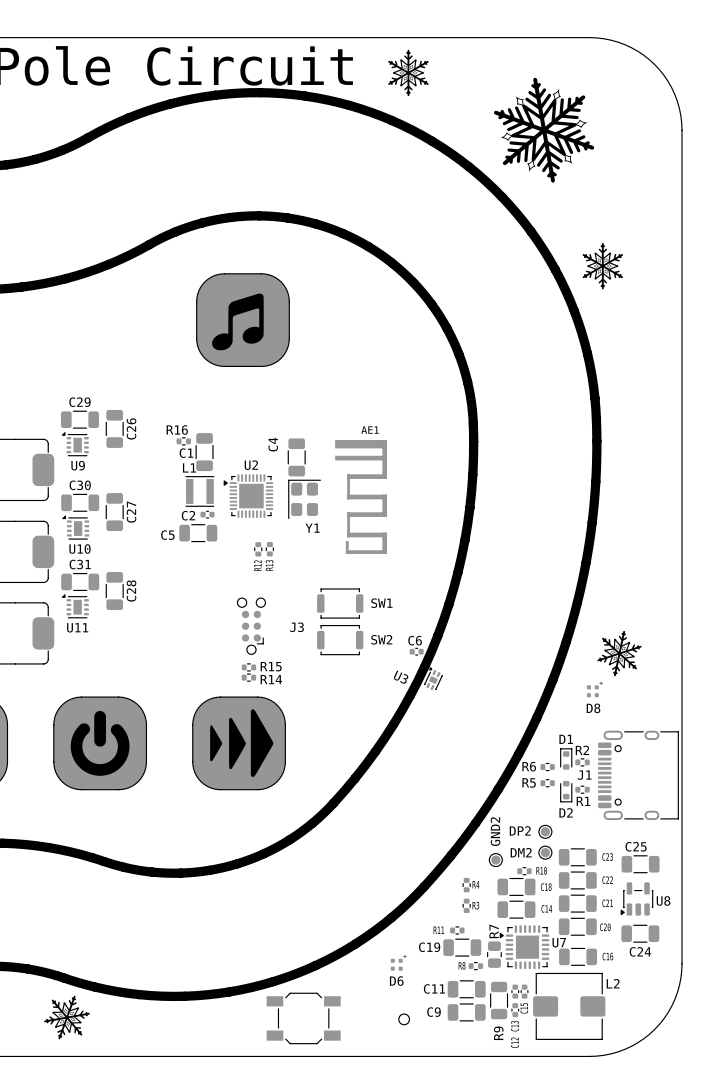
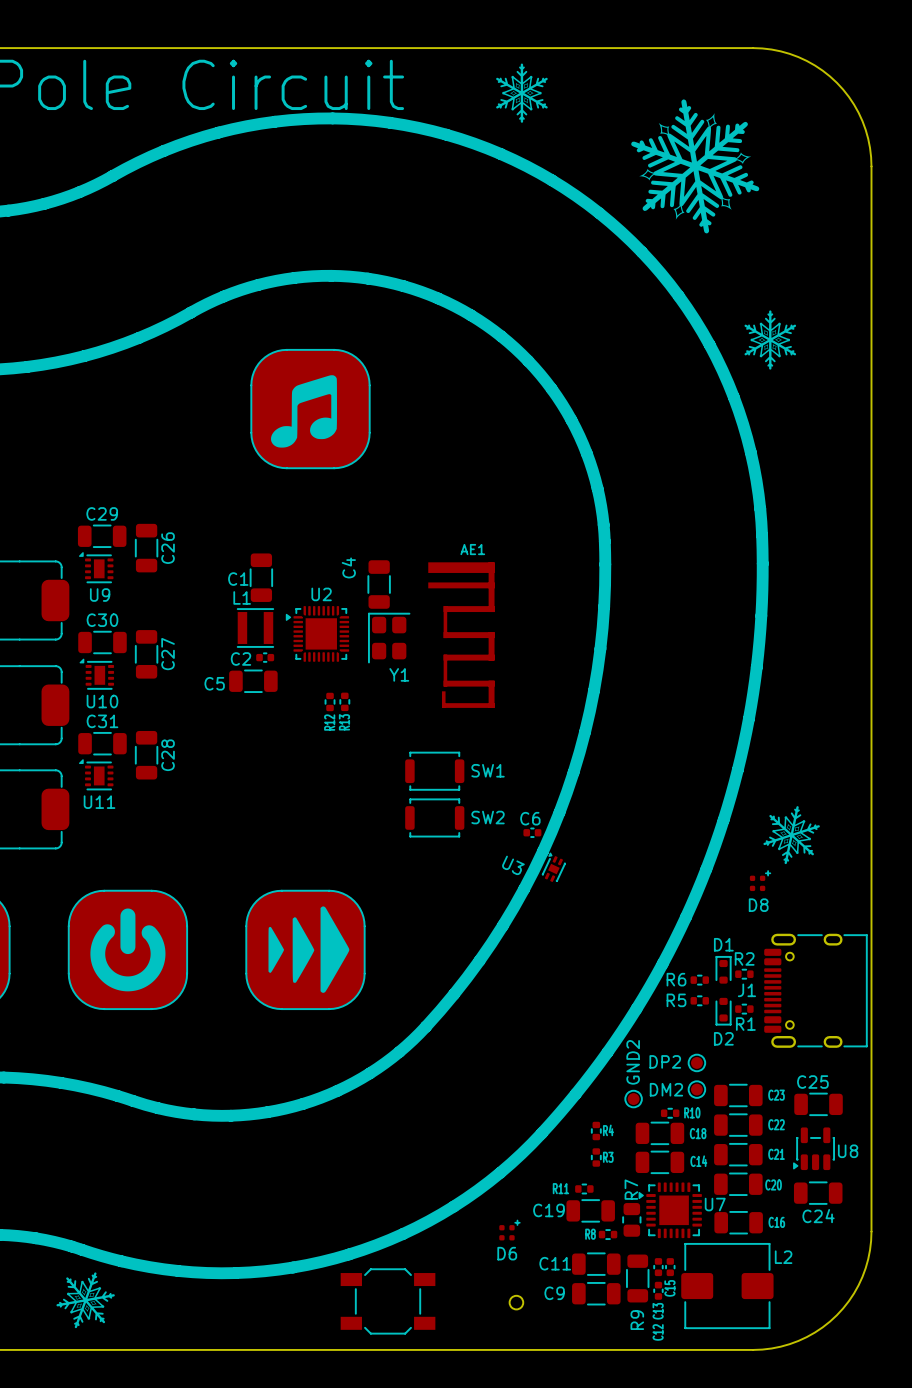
R16: (183, 441) -> none
J3: (251, 626) -> none
R15: (248, 667) -> none
R14: (248, 677) -> none

